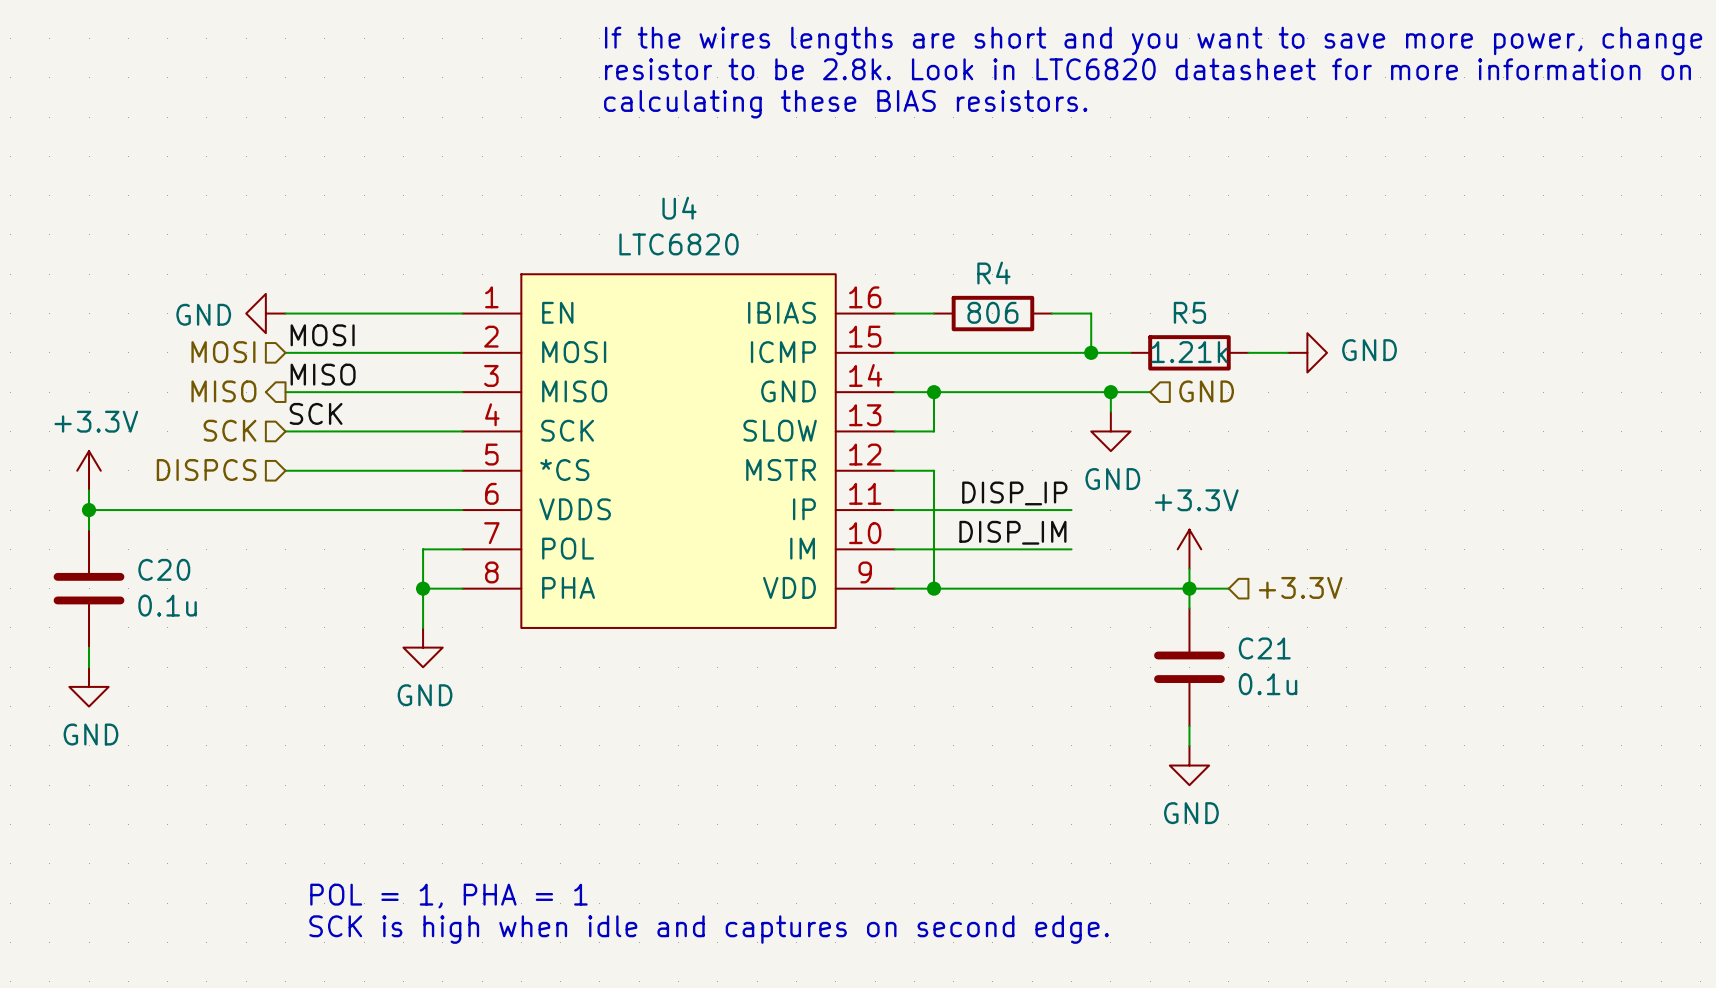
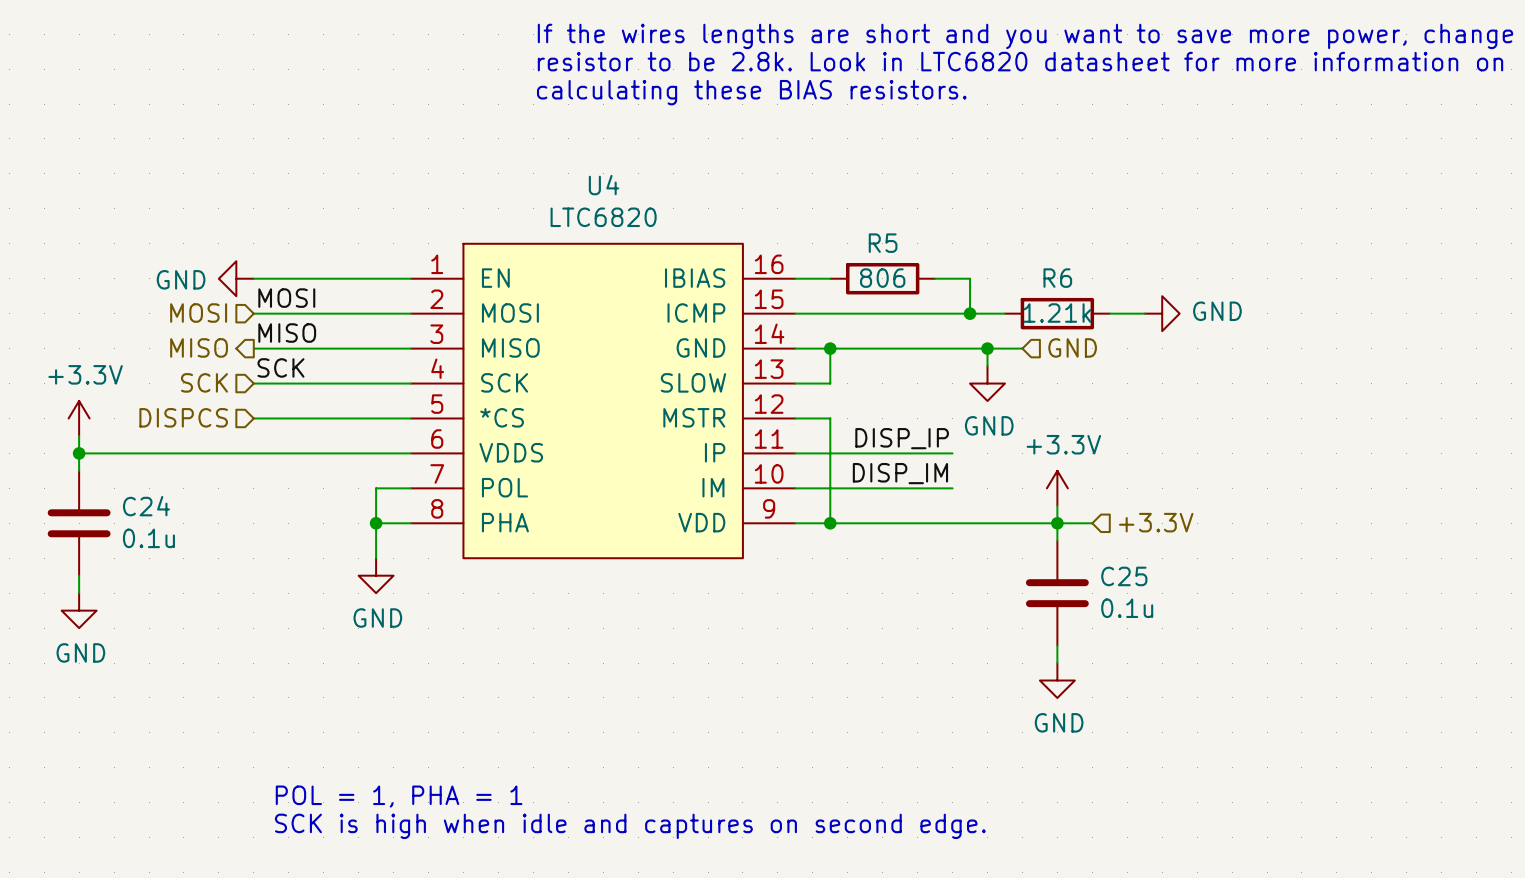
R4 name: R4 (993, 273) -> R5 (883, 243)
R5 name: R5 (1189, 312) -> R6 (1057, 278)
C20 name: C20 (164, 569) -> C24 (146, 506)
C21 name: C21 (1264, 648) -> C25 (1124, 576)

